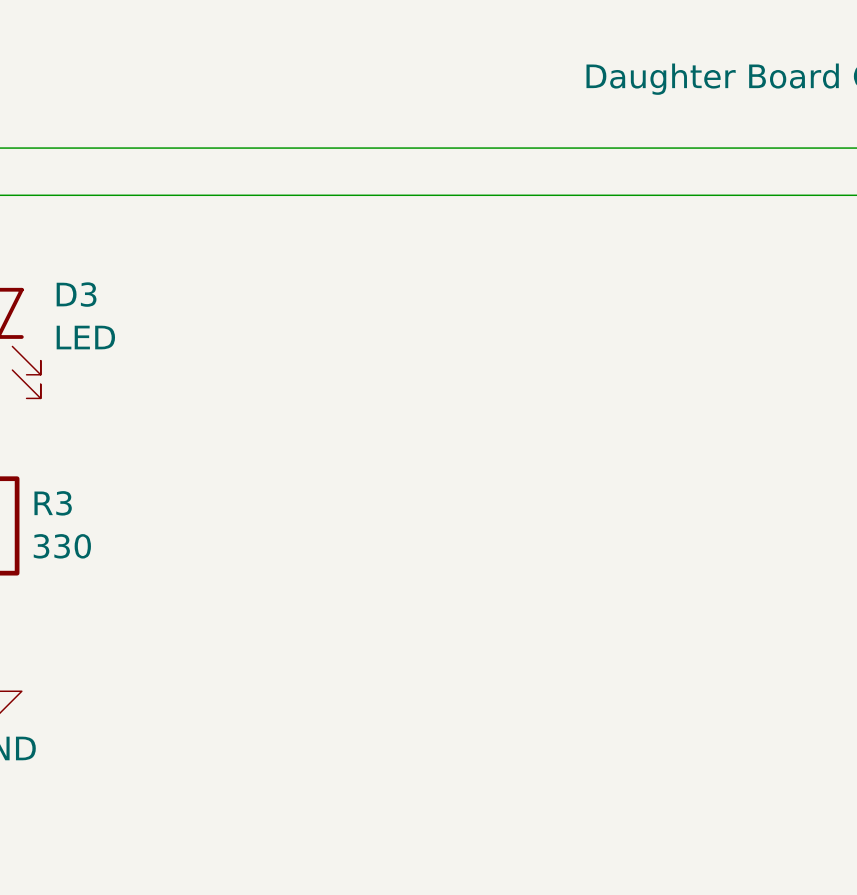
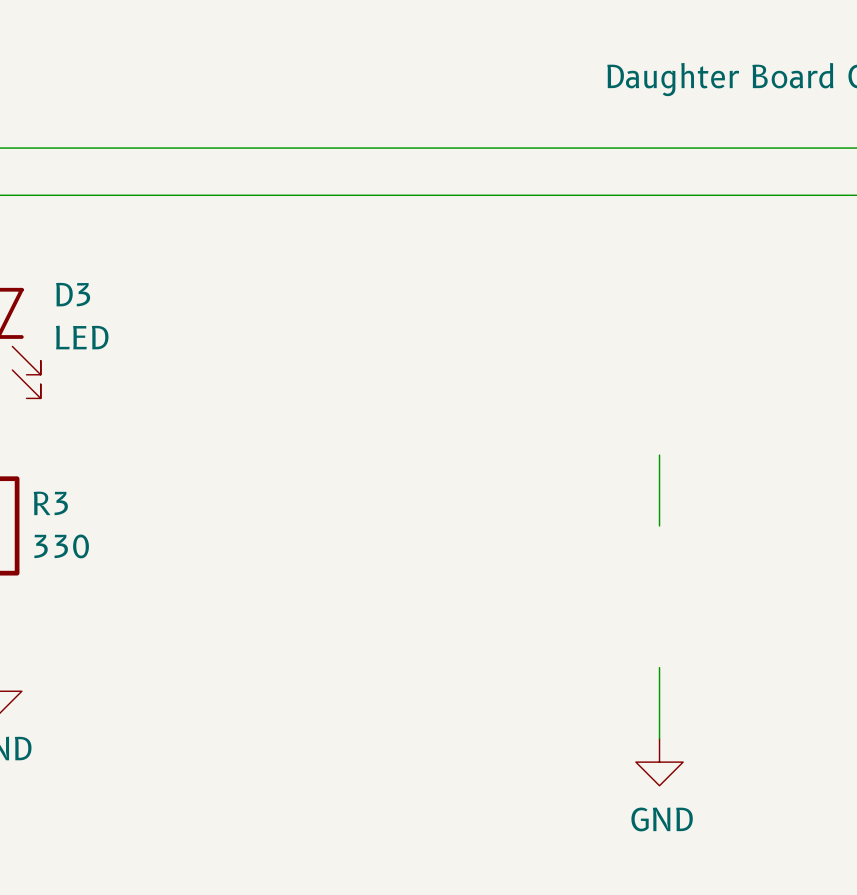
wire: none -> (659, 455) (659, 525)
wire: none -> (659, 667) (659, 738)
power symbol: none -> GND (659, 762)

